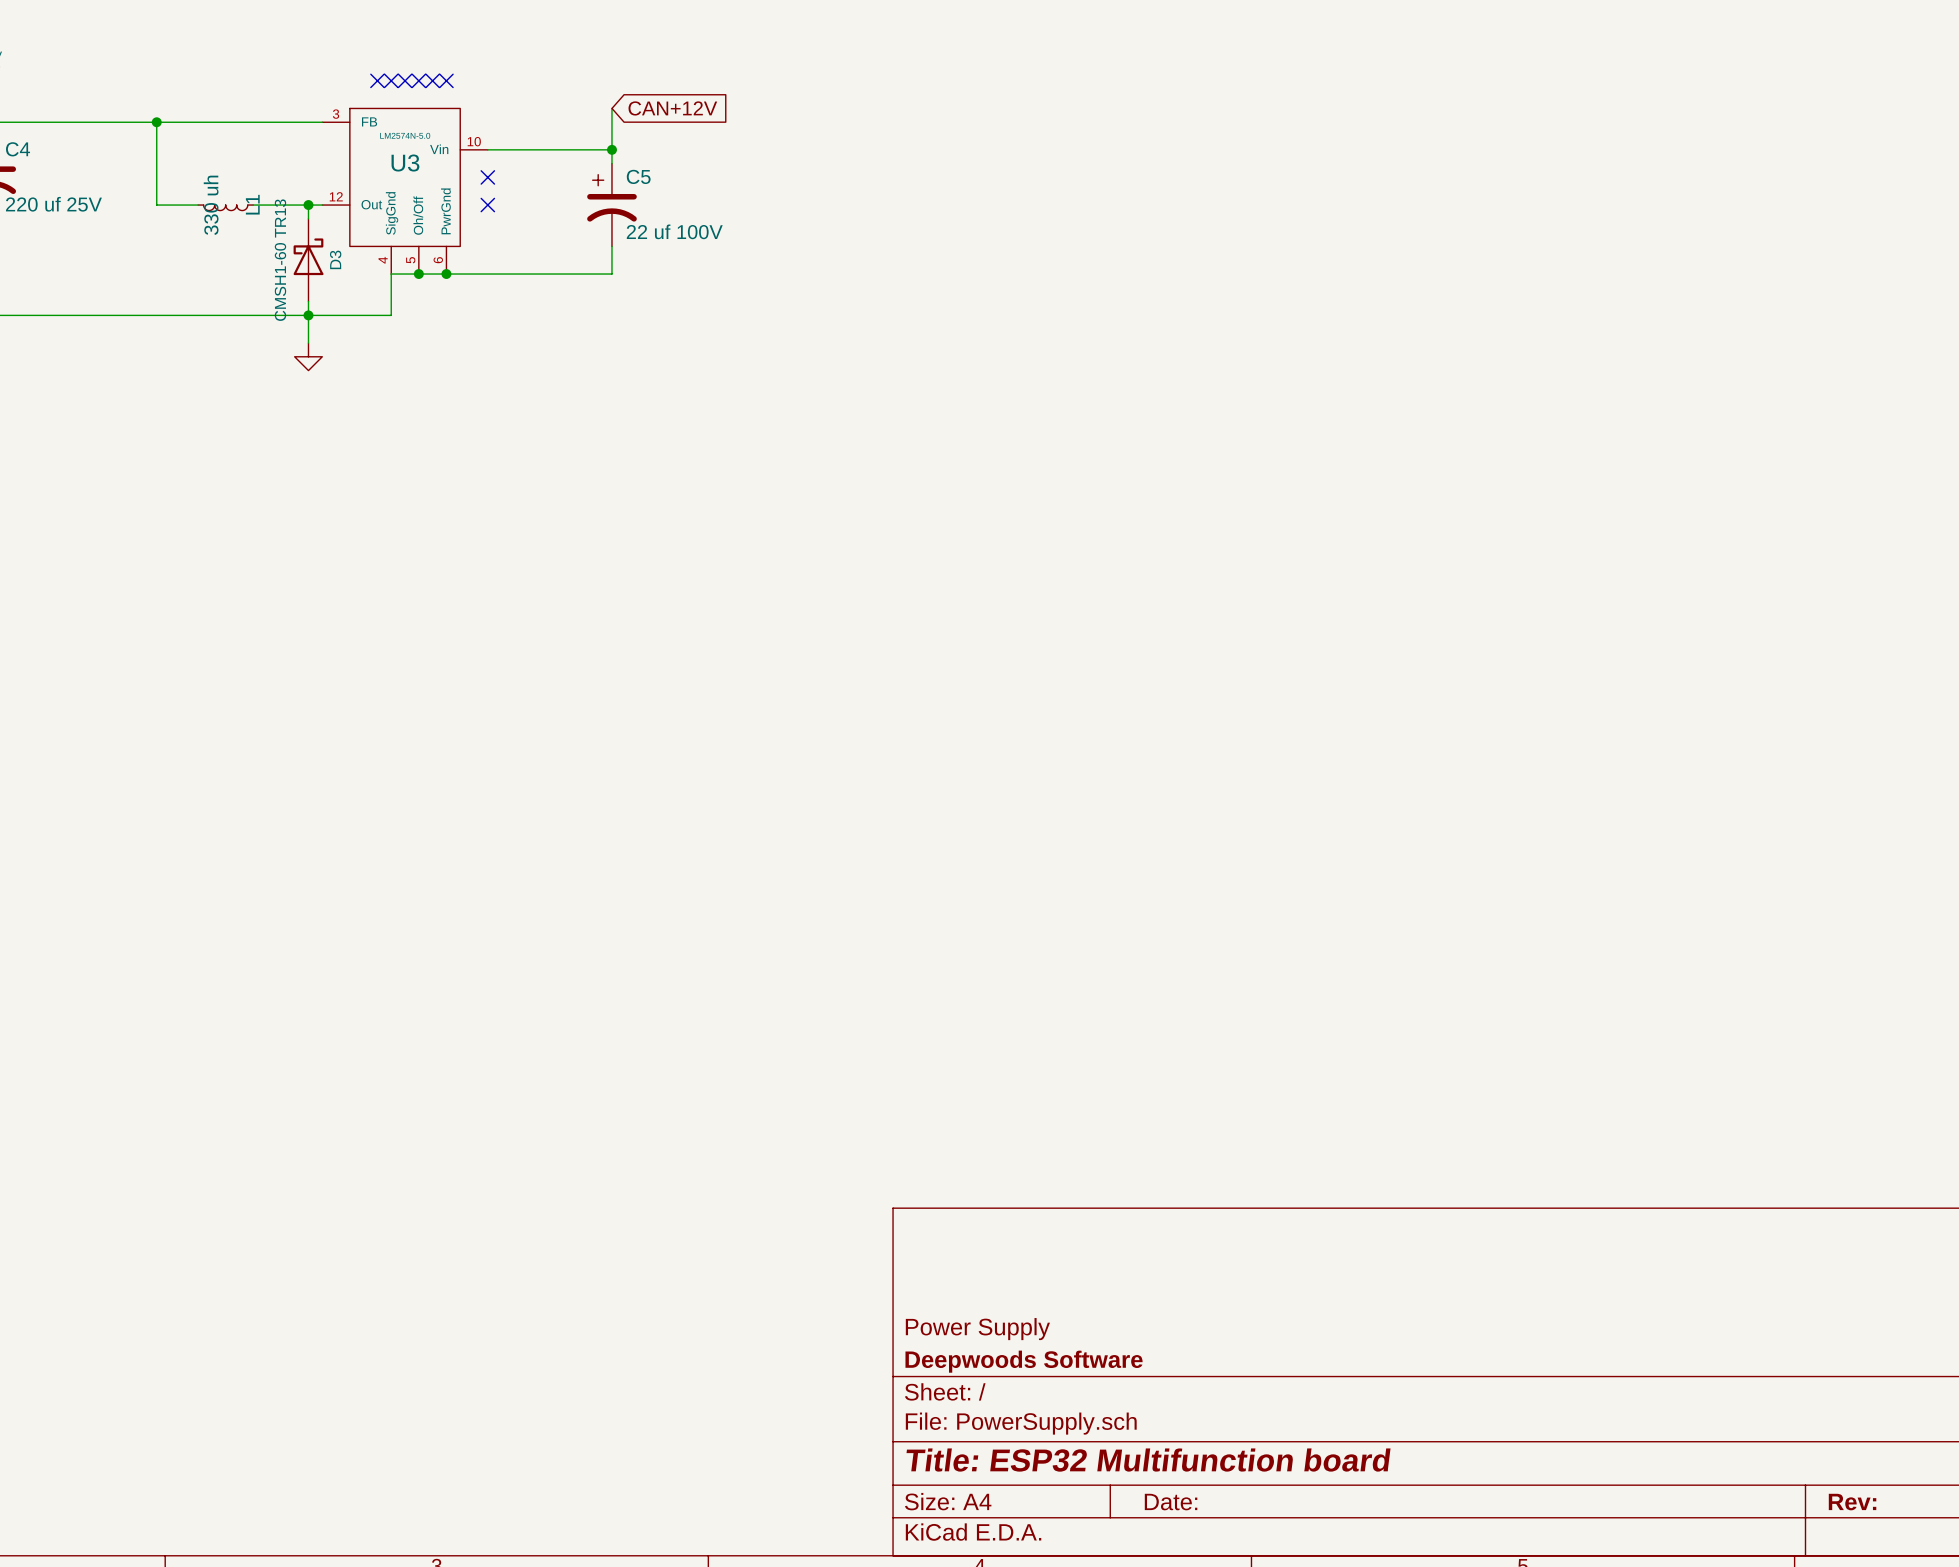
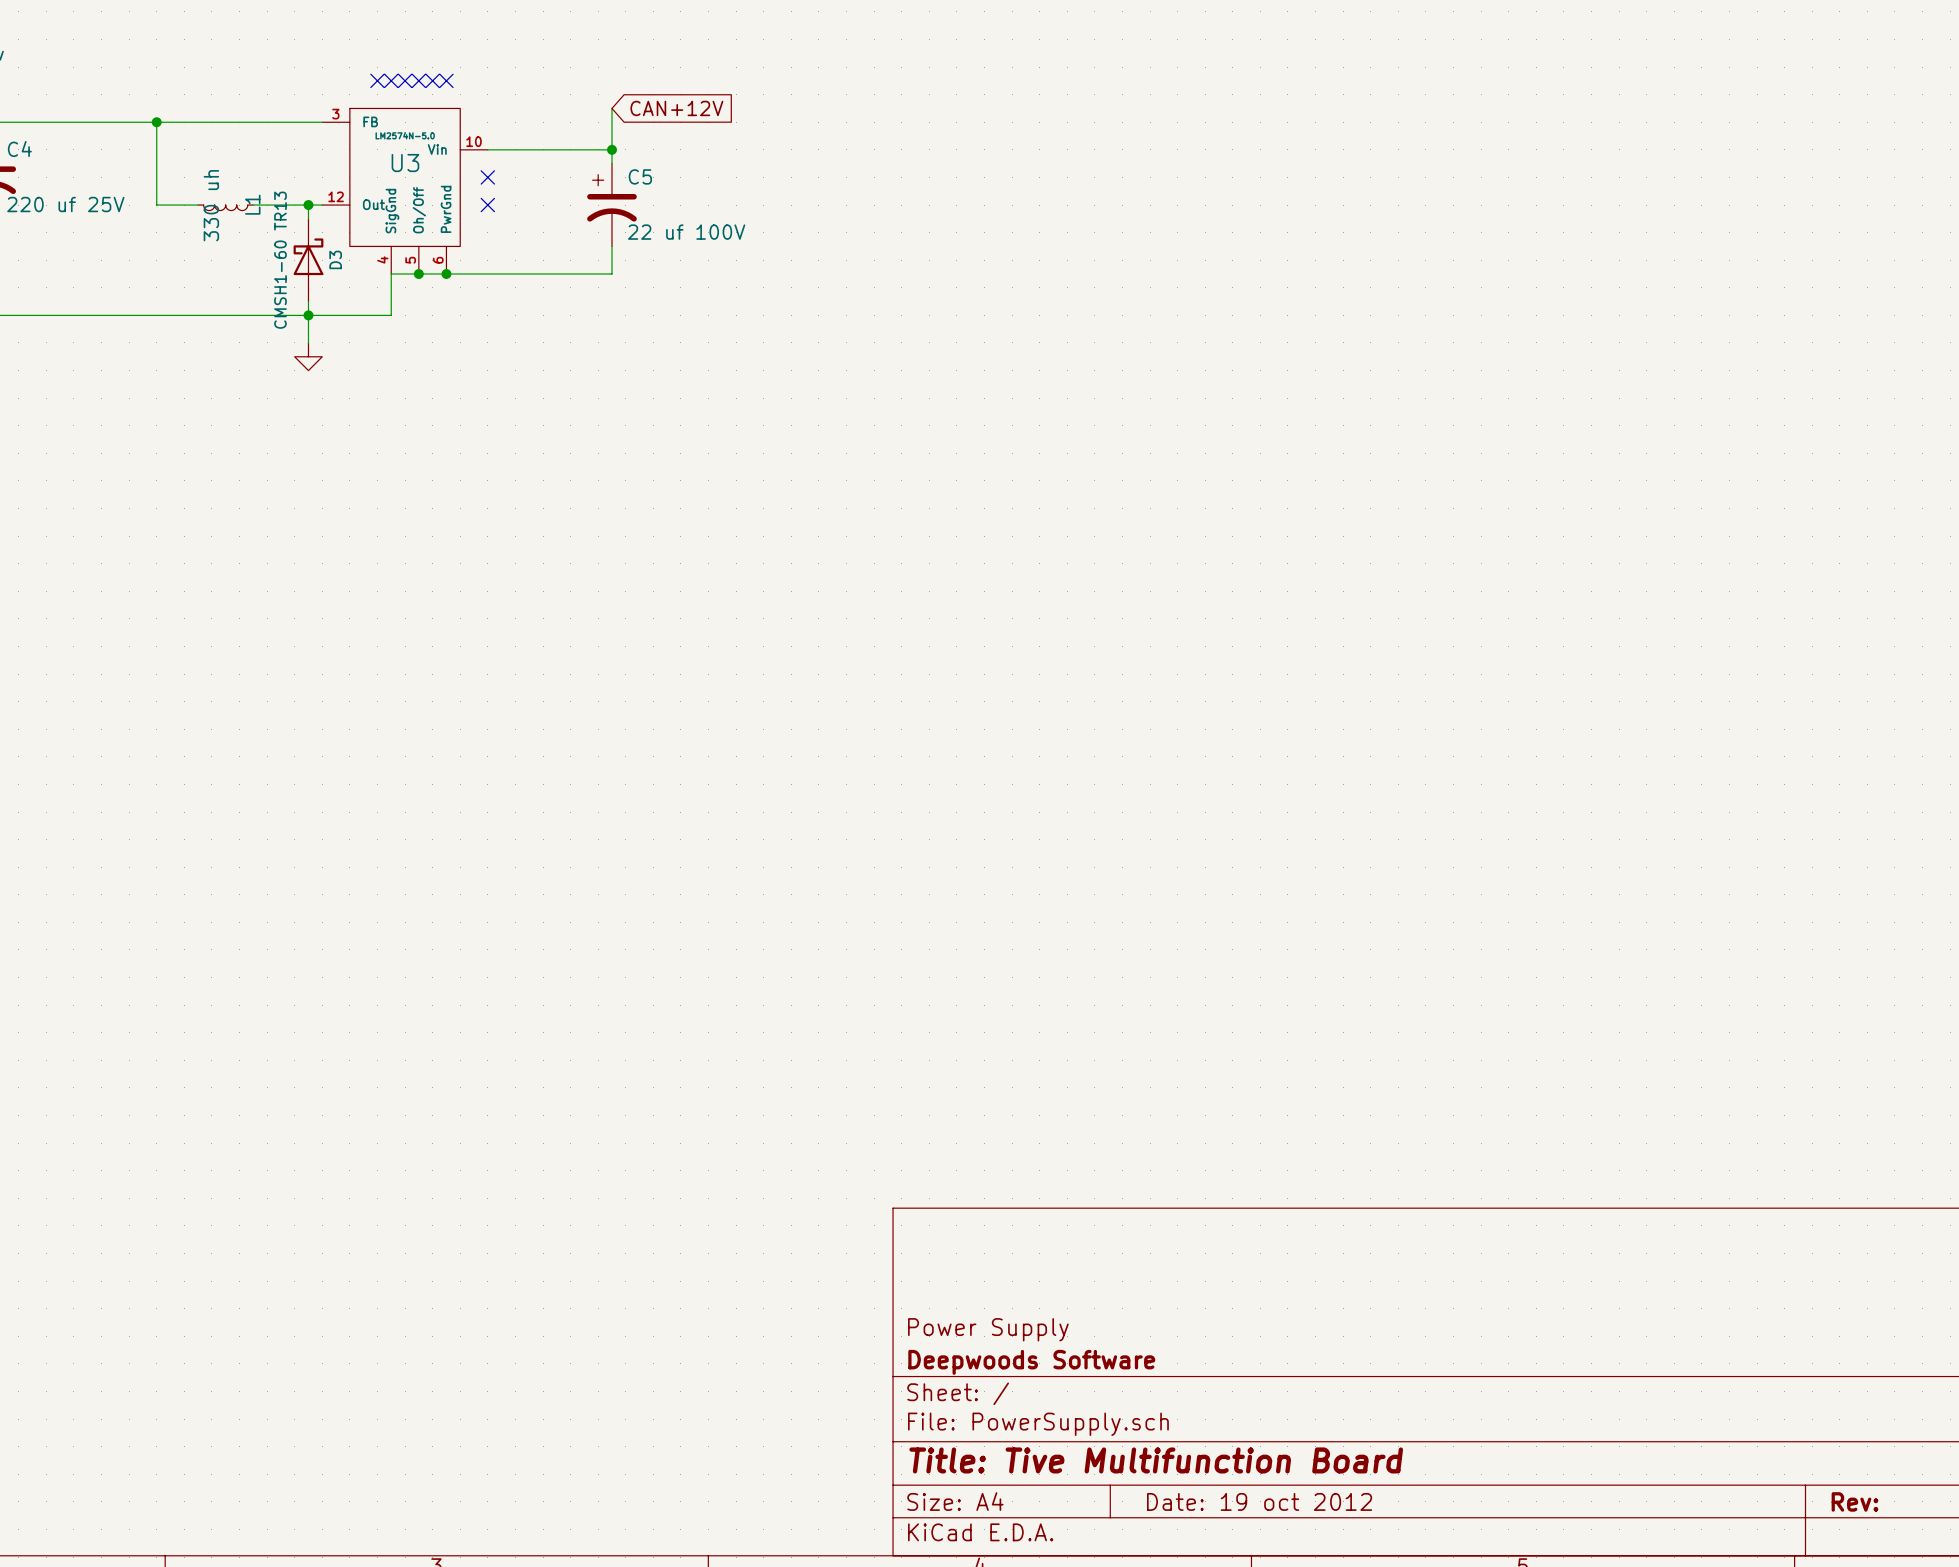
title block: Title: ESP32 Multifunction board (1148, 1460) -> Title: Tive Multifunction Board (1156, 1460)
title block: Date: (1171, 1502) -> Date: 19 oct 2012 (1259, 1501)

